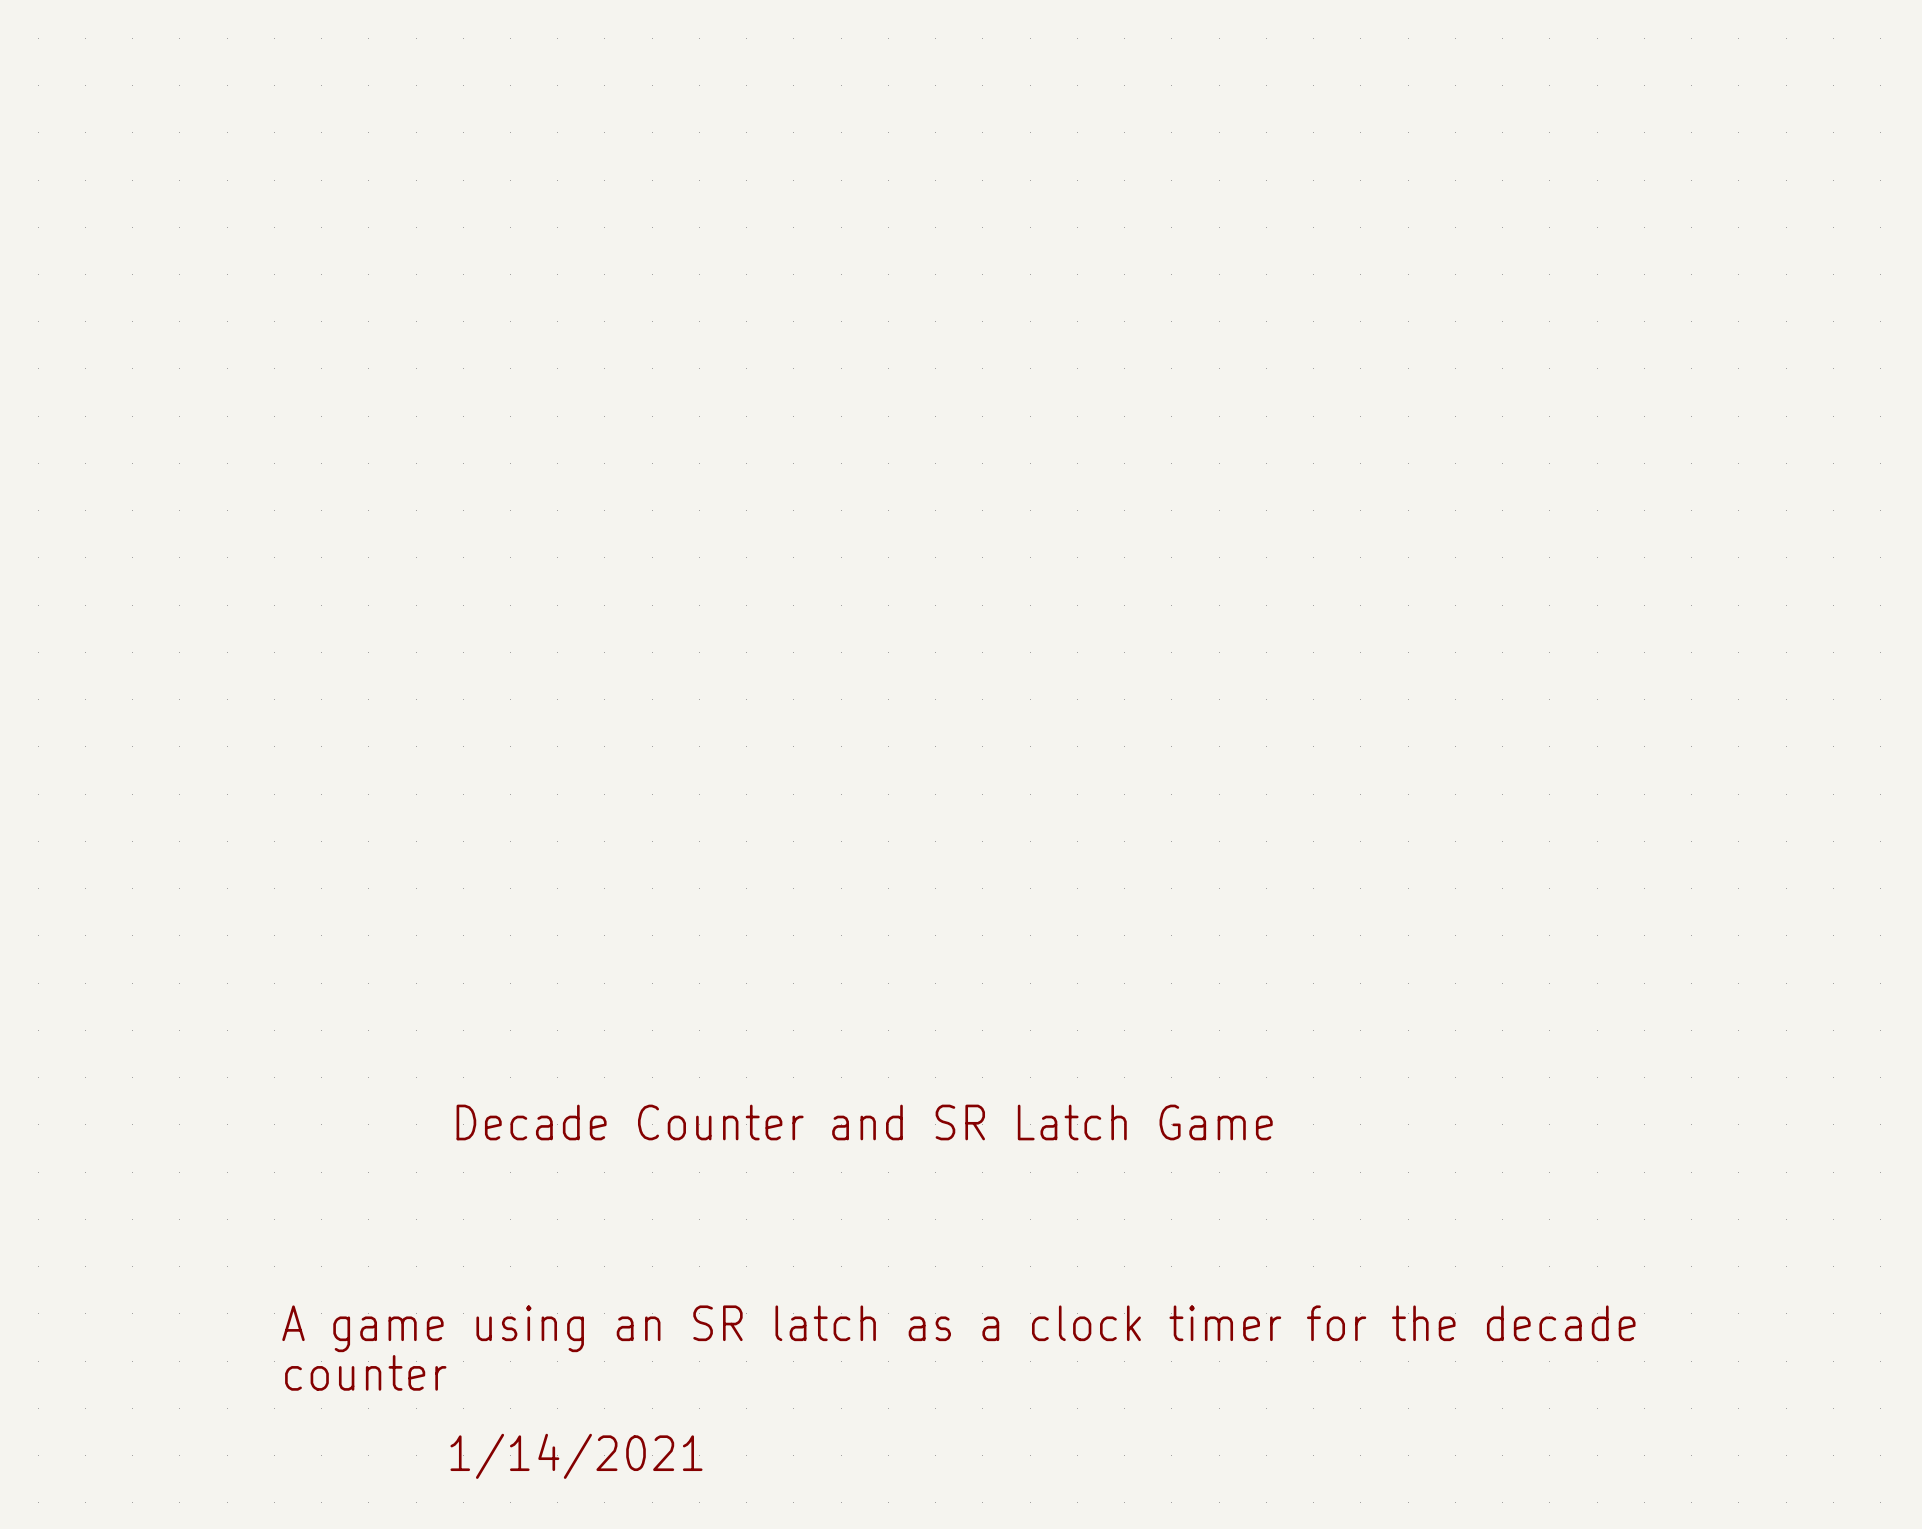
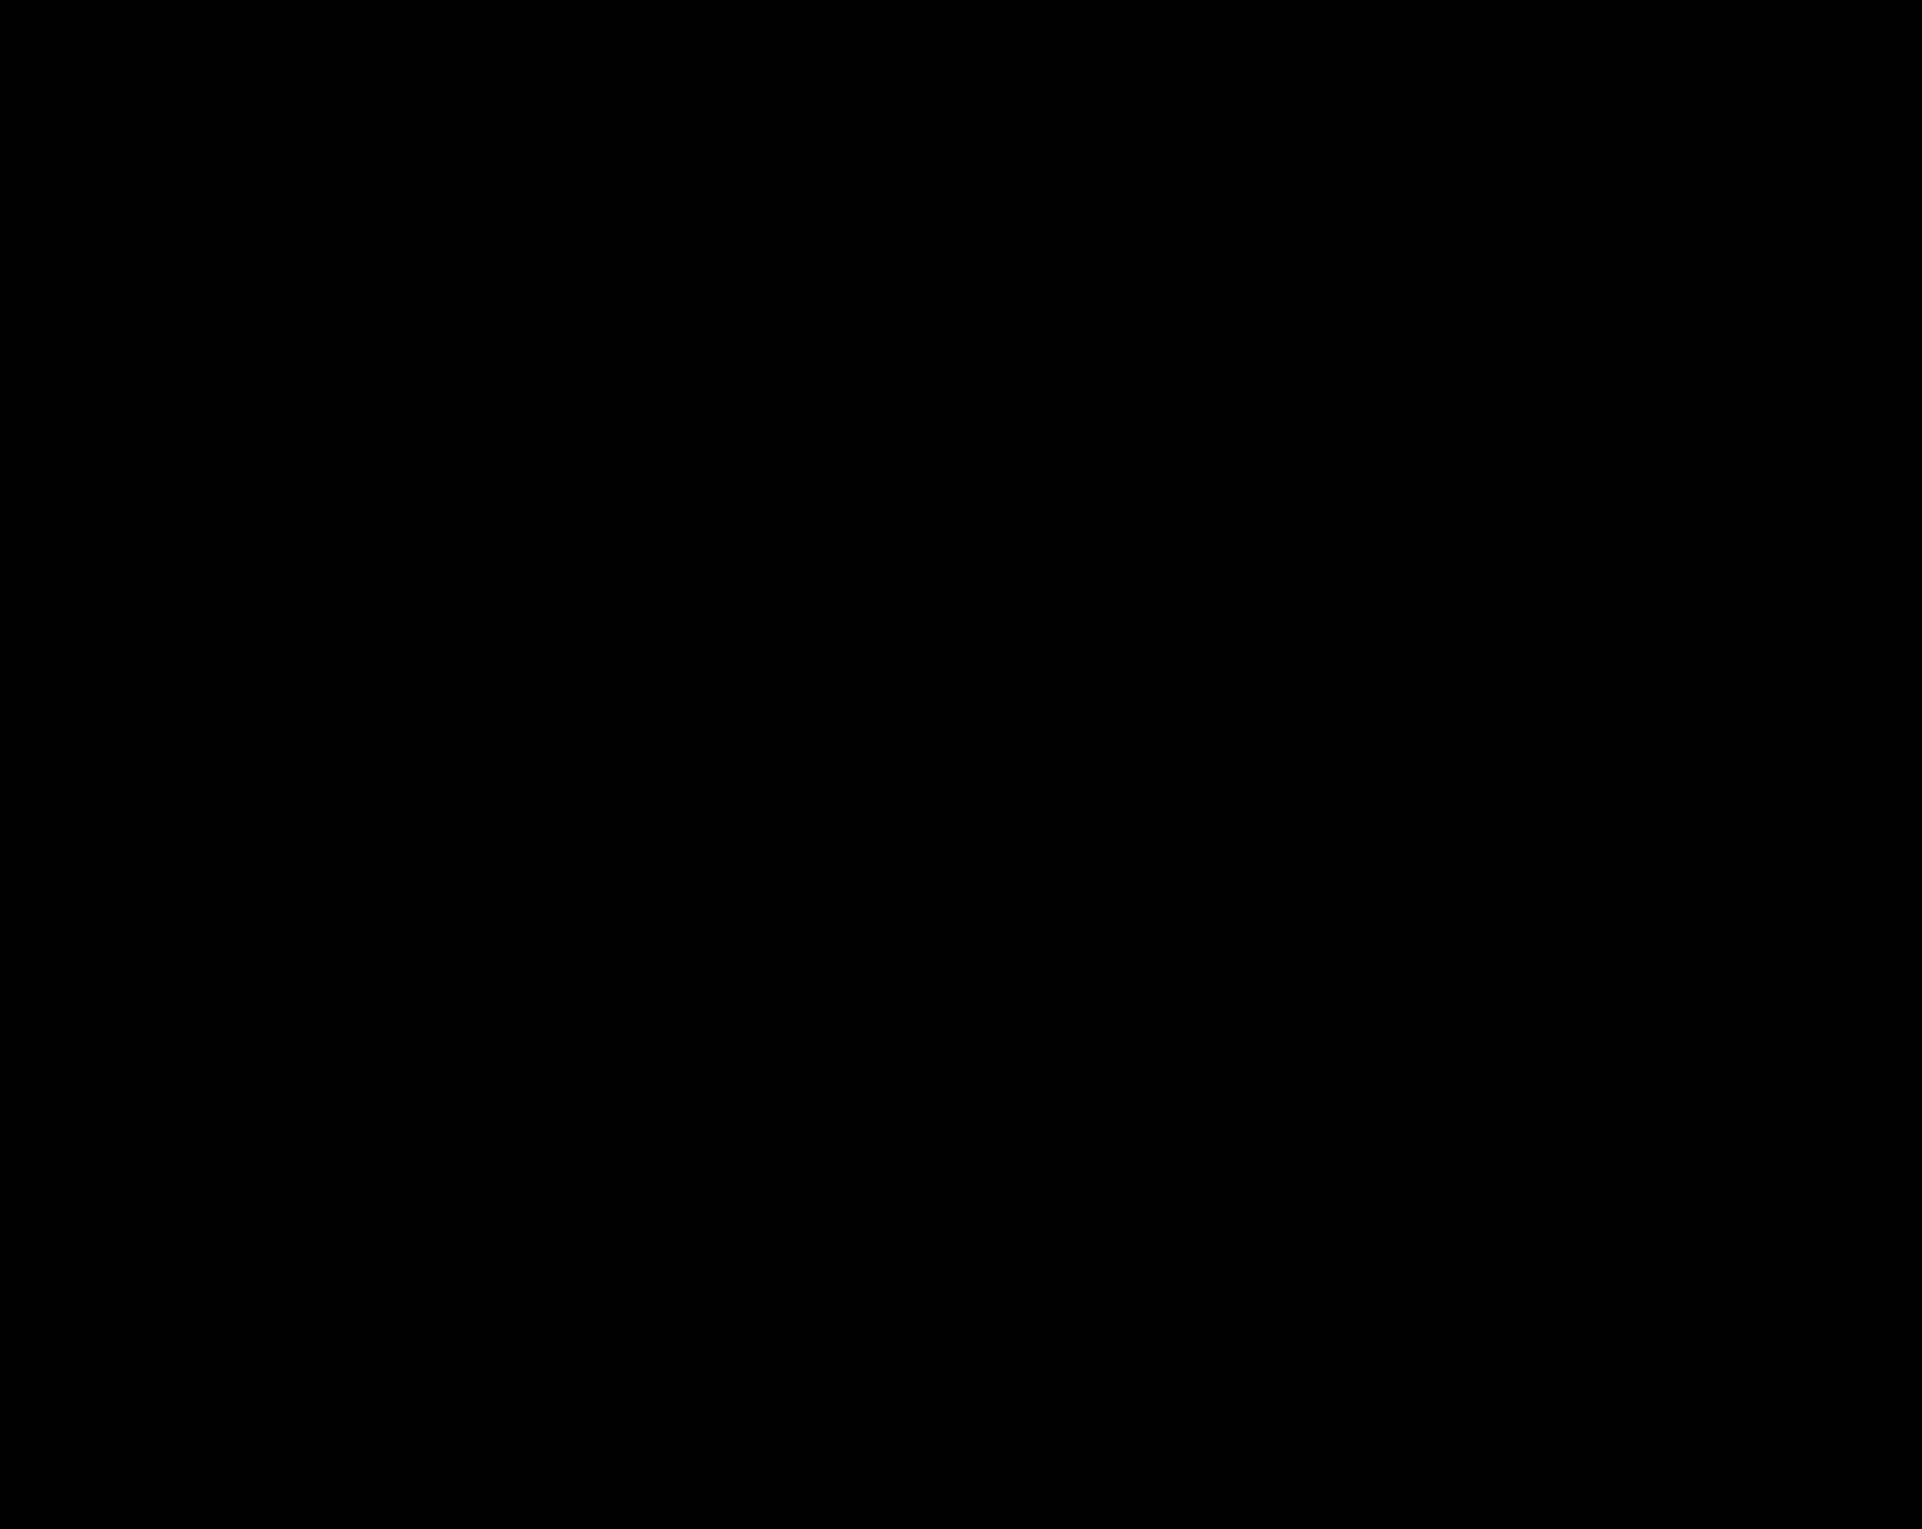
text: Decade Counter and SR Latch Game (864, 1122) -> none
text: A game using an SR latch as a clock timer for the decade (958, 1328) -> none
text: counter (365, 1372) -> none
text: 1/14/2021 (576, 1456) -> none

